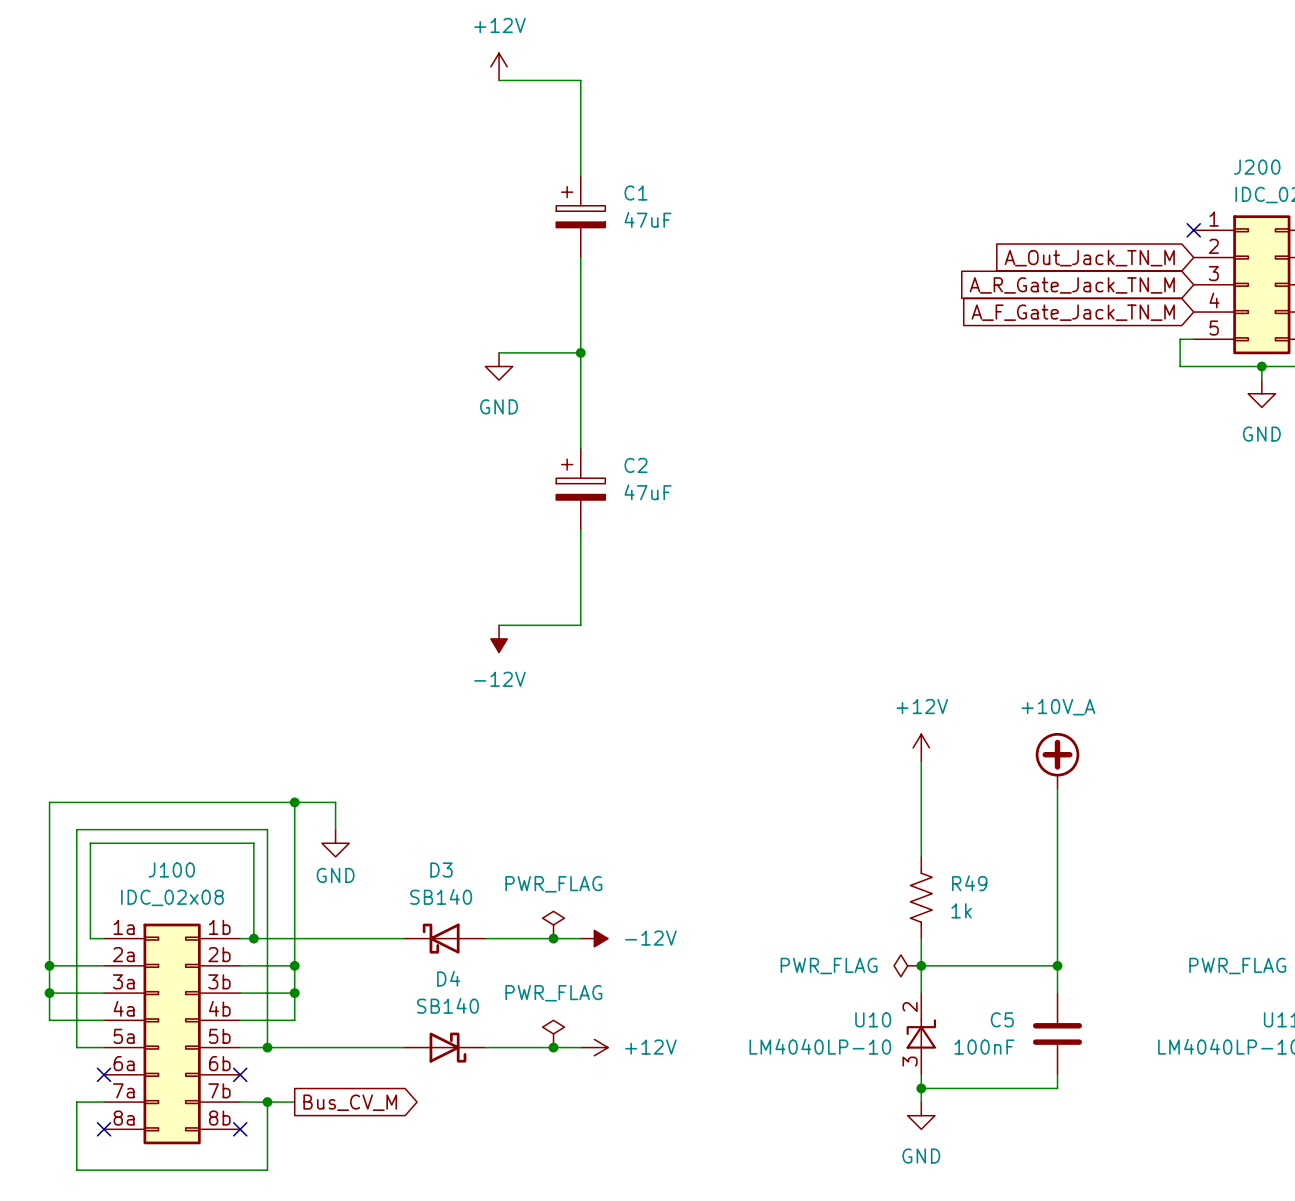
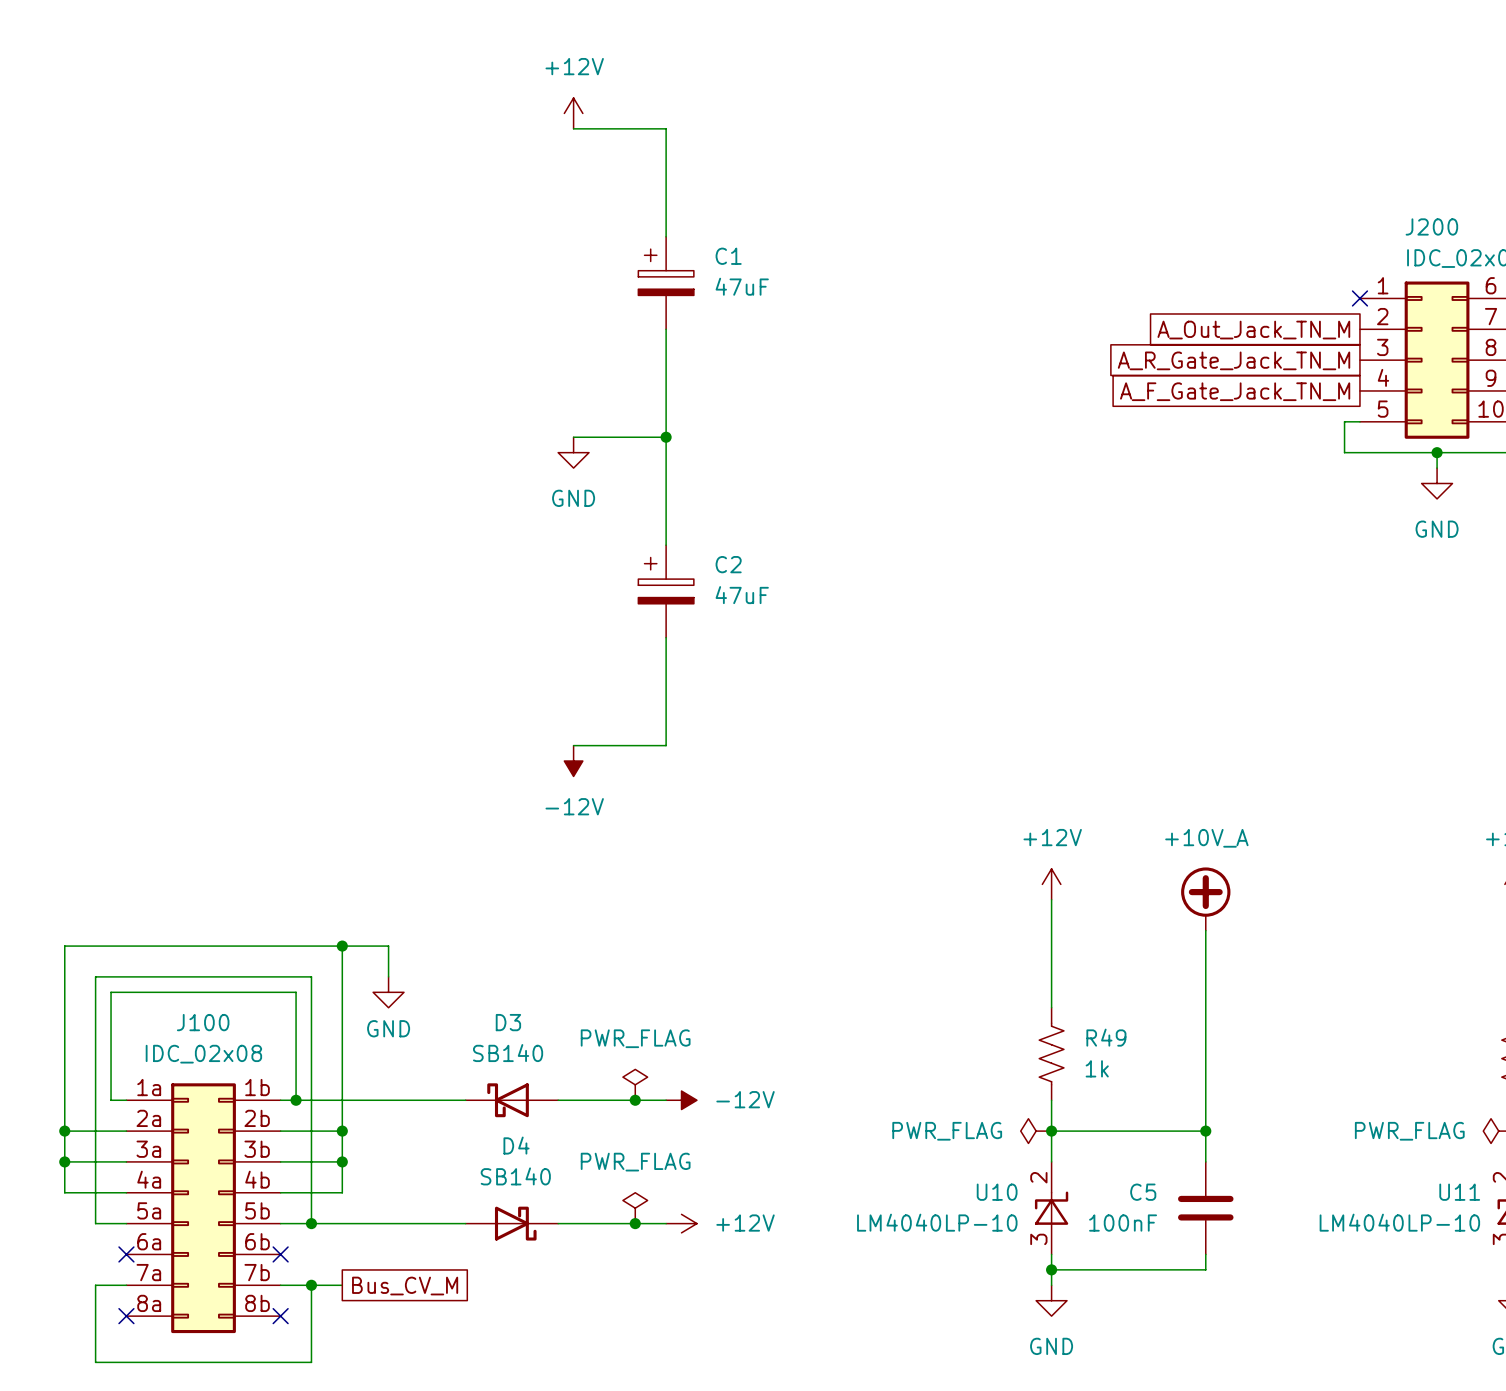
global label shape: input (1089, 258) -> passive (1253, 330)
global label shape: input (1072, 285) -> passive (1234, 360)
global label shape: input (1073, 312) -> passive (1235, 391)
global label shape: output (350, 1102) -> passive (405, 1286)

